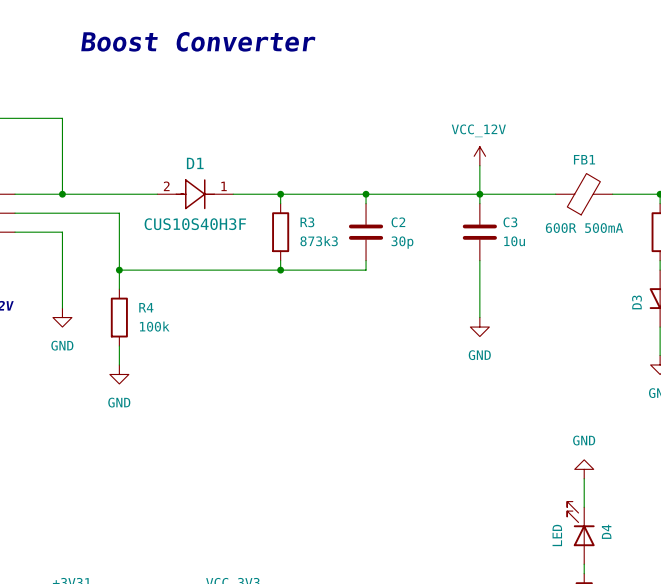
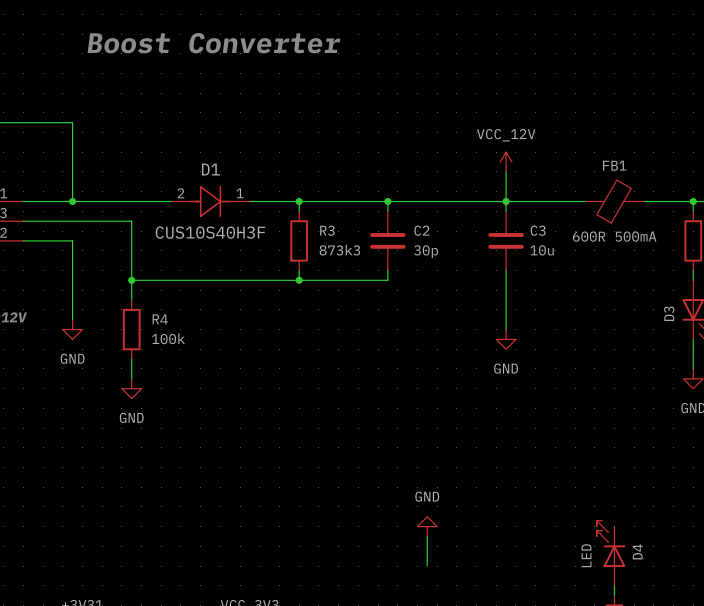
power symbol position: GND (584, 469) -> GND (427, 526)
wire: (584, 478) (584, 507) -> (427, 536) (427, 566)

